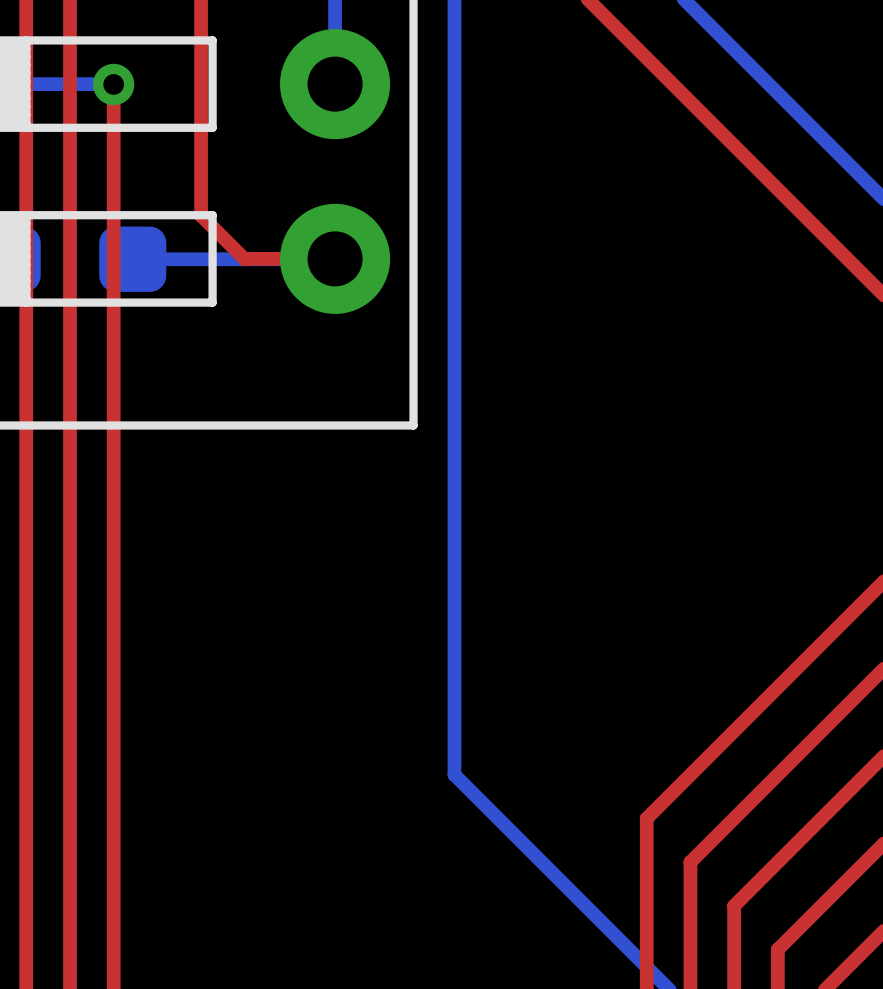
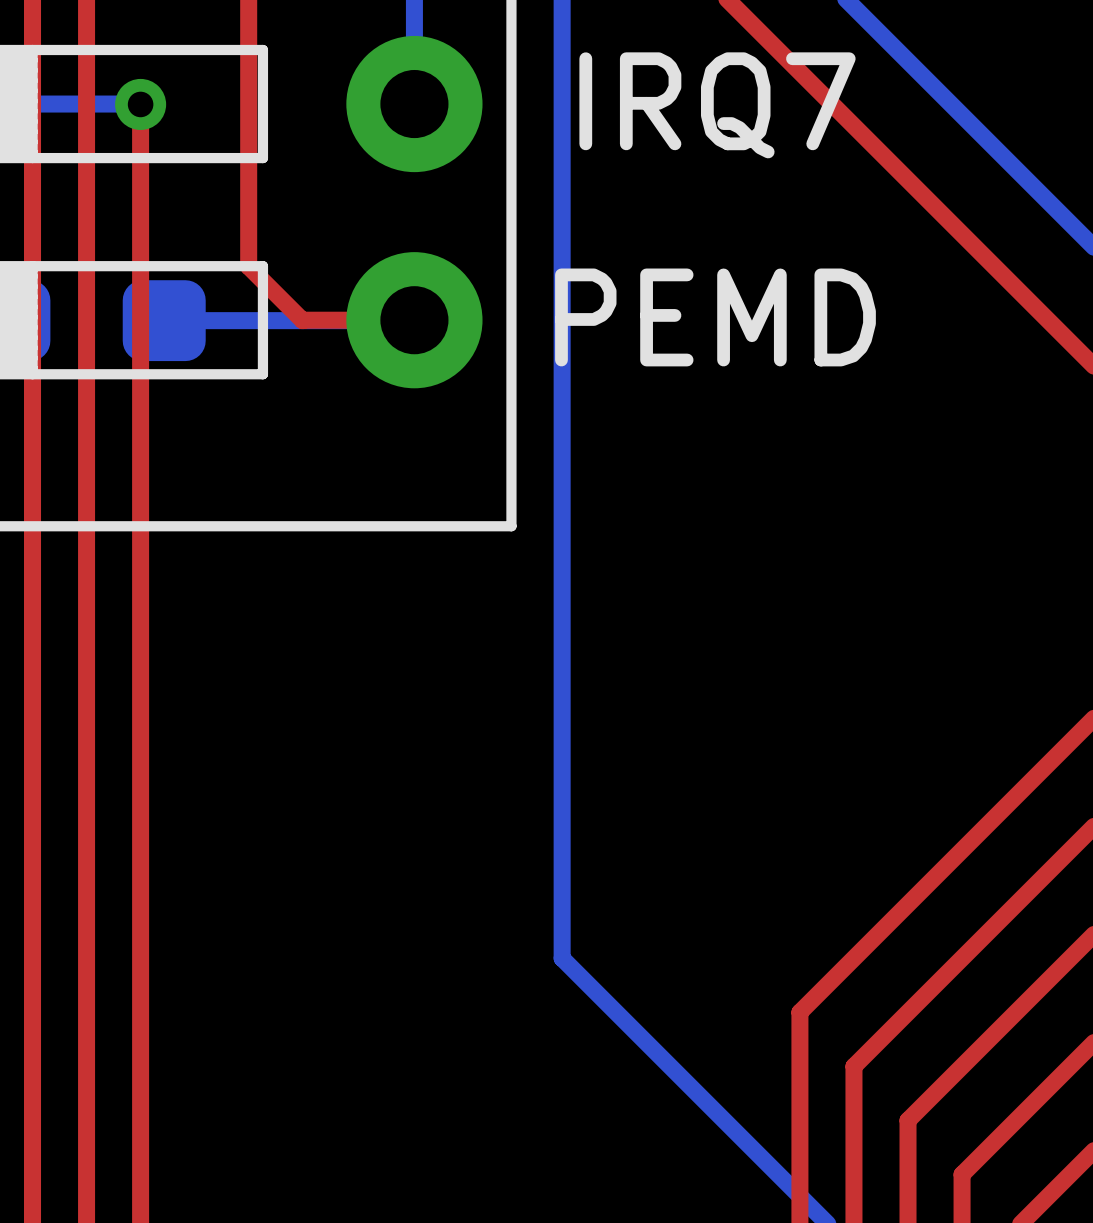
text: none -> IRQ7 (717, 105)
text: none -> PEMD (715, 317)

